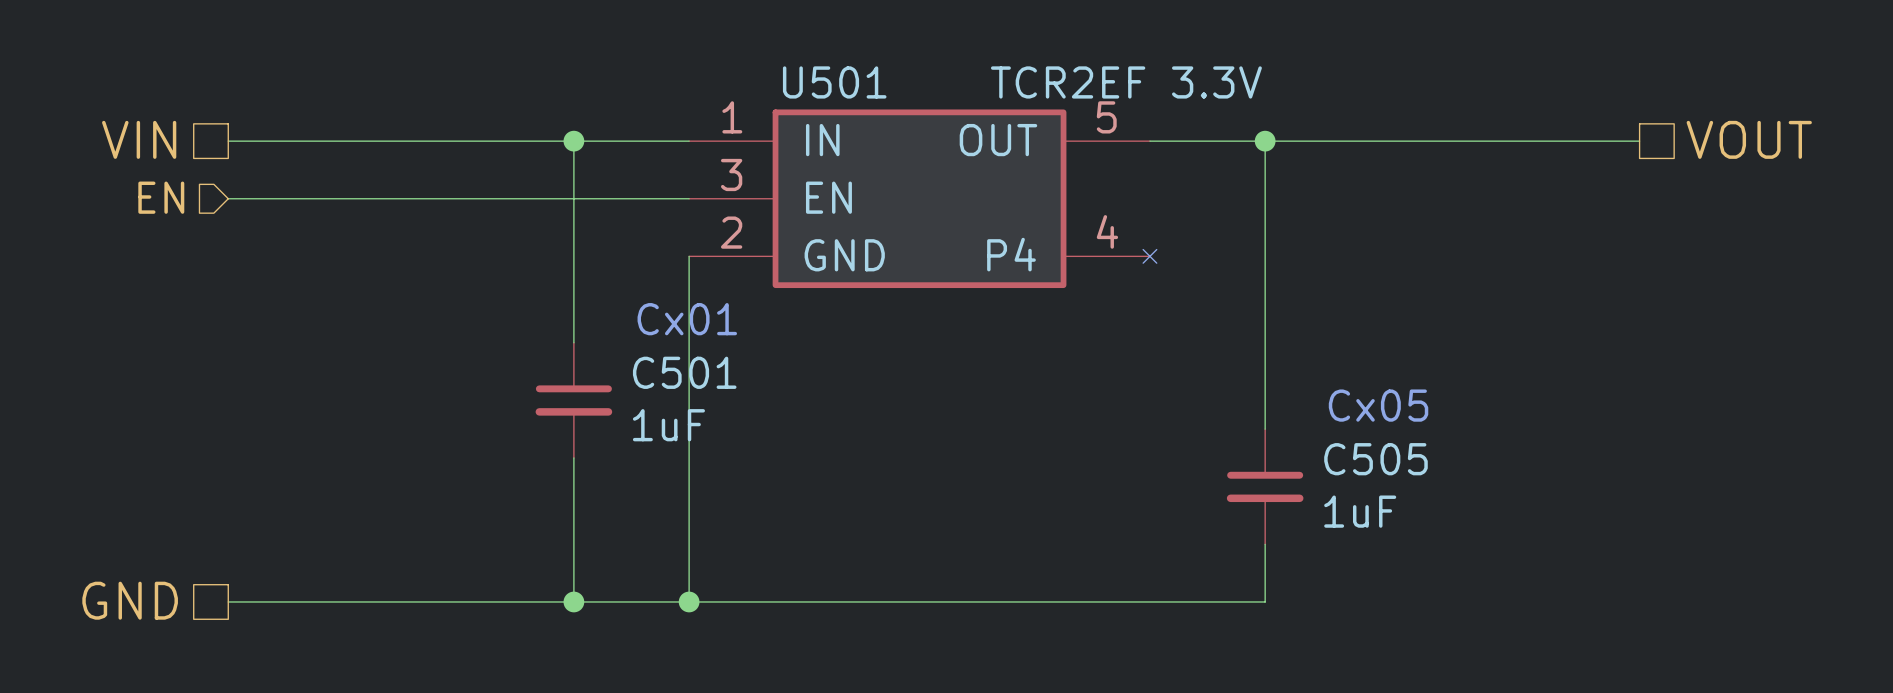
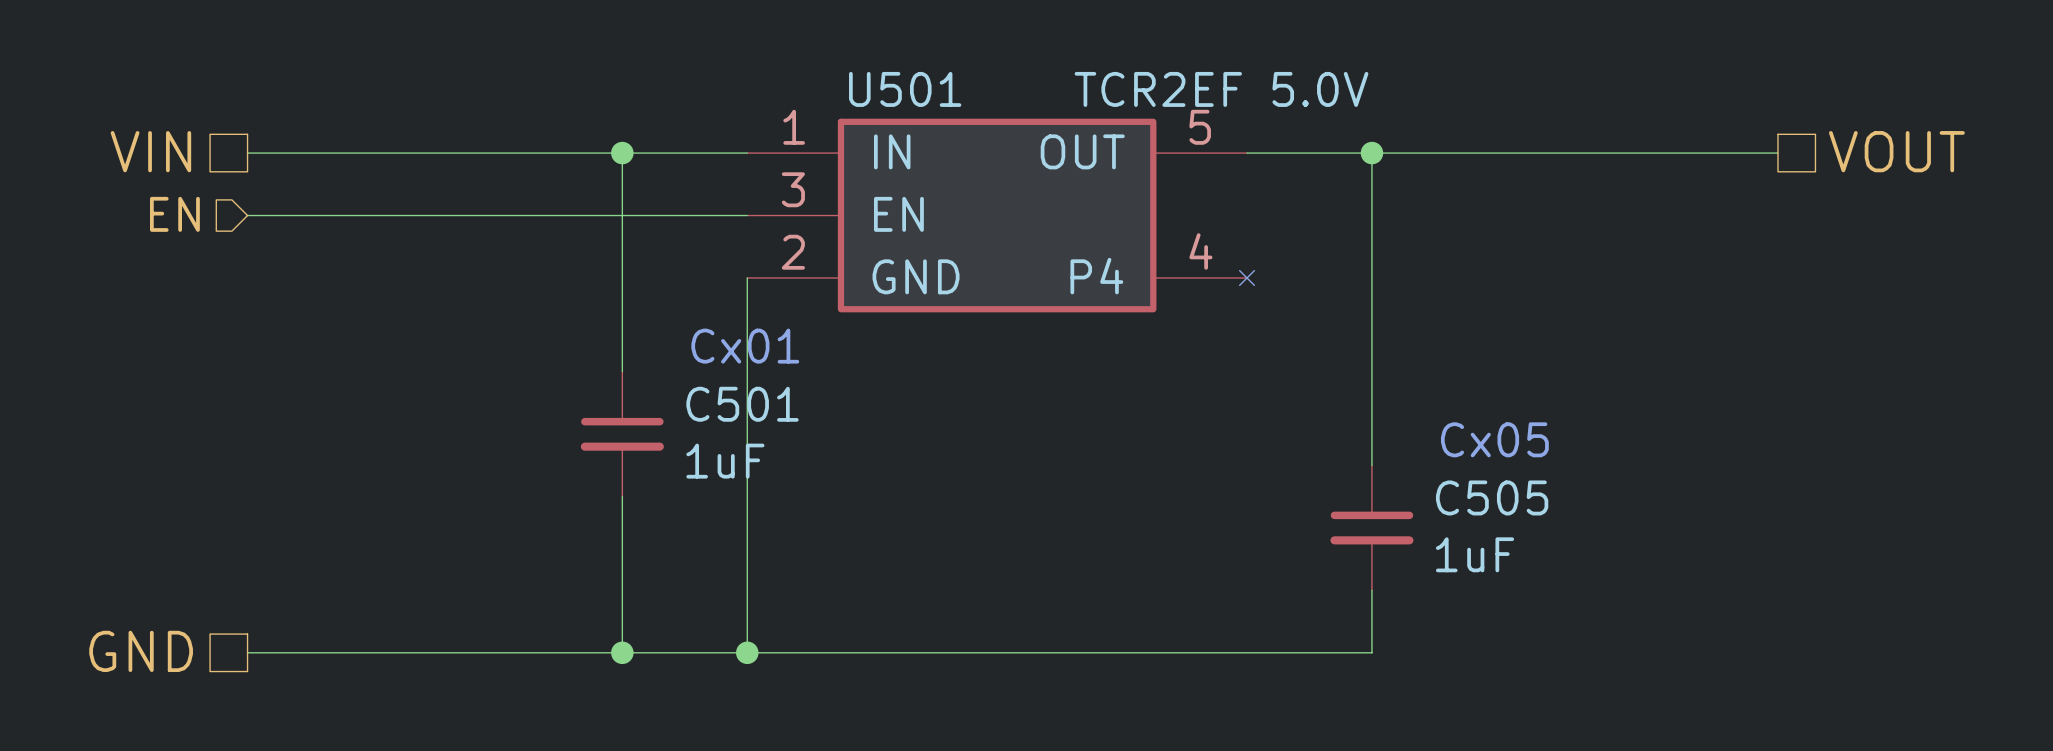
U501 value: TCR2EF 3.3V (1126, 82) -> TCR2EF 5.0V (1221, 89)

